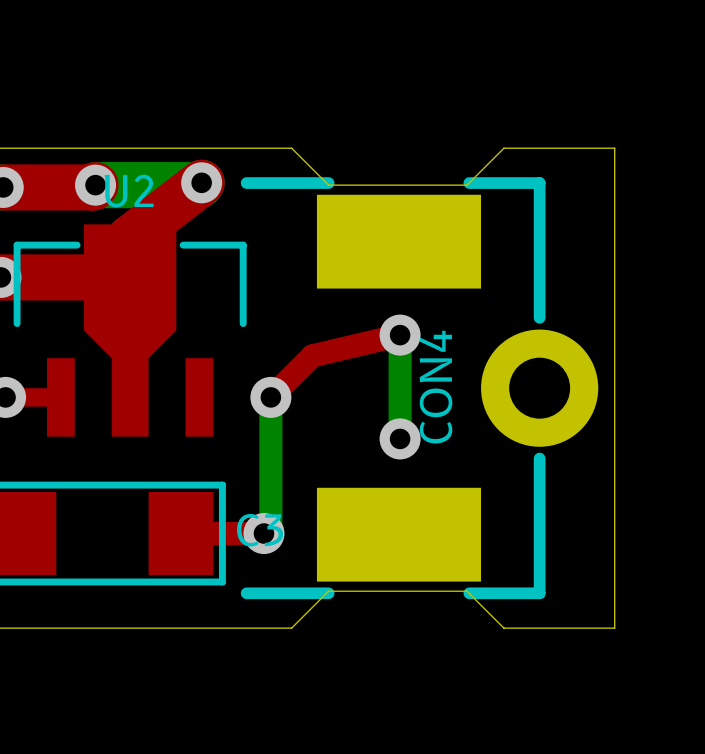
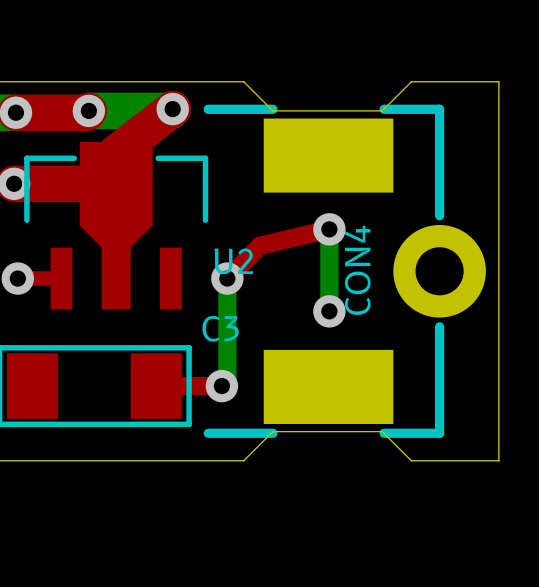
U2 name position: U2 (129, 191) -> U2 (233, 261)
C3 name position: C3 (260, 530) -> C3 (220, 328)

